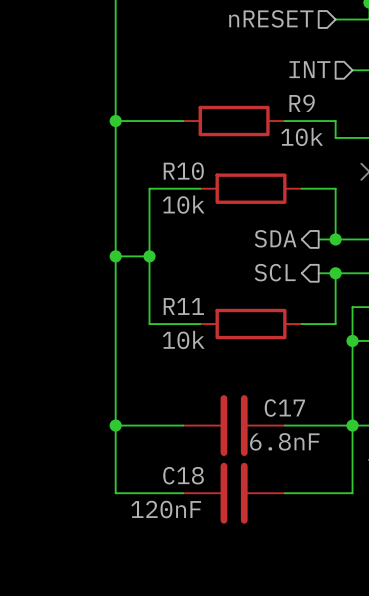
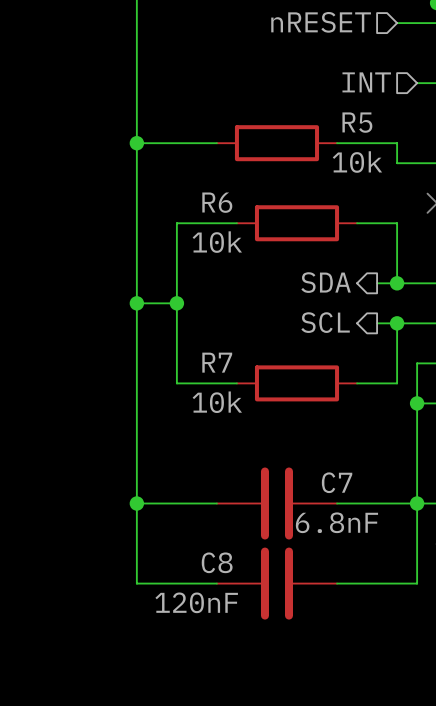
R9 name: R9 (302, 103) -> R5 (357, 122)
R10 name: R10 (183, 171) -> R6 (217, 202)
R11 name: R11 (183, 306) -> R7 (217, 362)
C17 name: C17 (284, 408) -> C7 (337, 482)
C18 name: C18 (183, 475) -> C8 (217, 562)

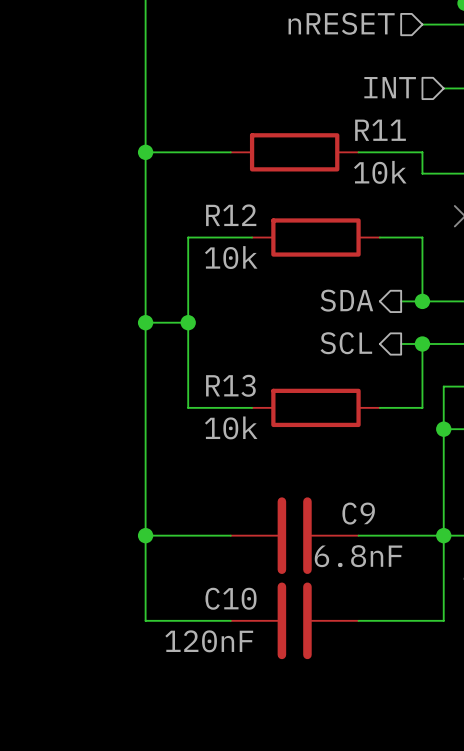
R5 name: R5 (357, 122) -> R11 (380, 130)
R6 name: R6 (217, 202) -> R12 (231, 215)
R7 name: R7 (217, 362) -> R13 (230, 385)
C7 name: C7 (337, 482) -> C9 (358, 513)
C8 name: C8 (217, 562) -> C10 (231, 598)

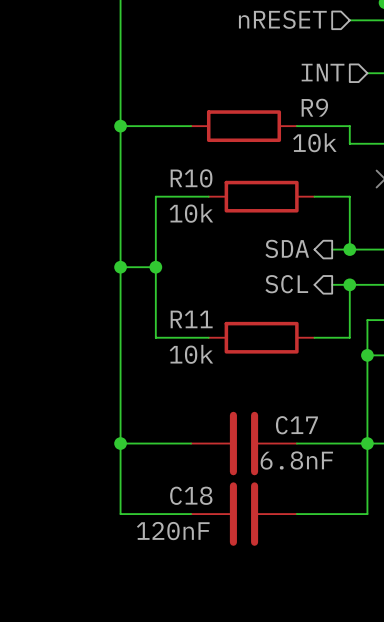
R11 name: R11 (380, 130) -> R9 (314, 107)
R12 name: R12 (231, 215) -> R10 (191, 178)
R13 name: R13 (230, 385) -> R11 (191, 319)
C9 name: C9 (358, 513) -> C17 (296, 425)
C10 name: C10 (231, 598) -> C18 (191, 495)

